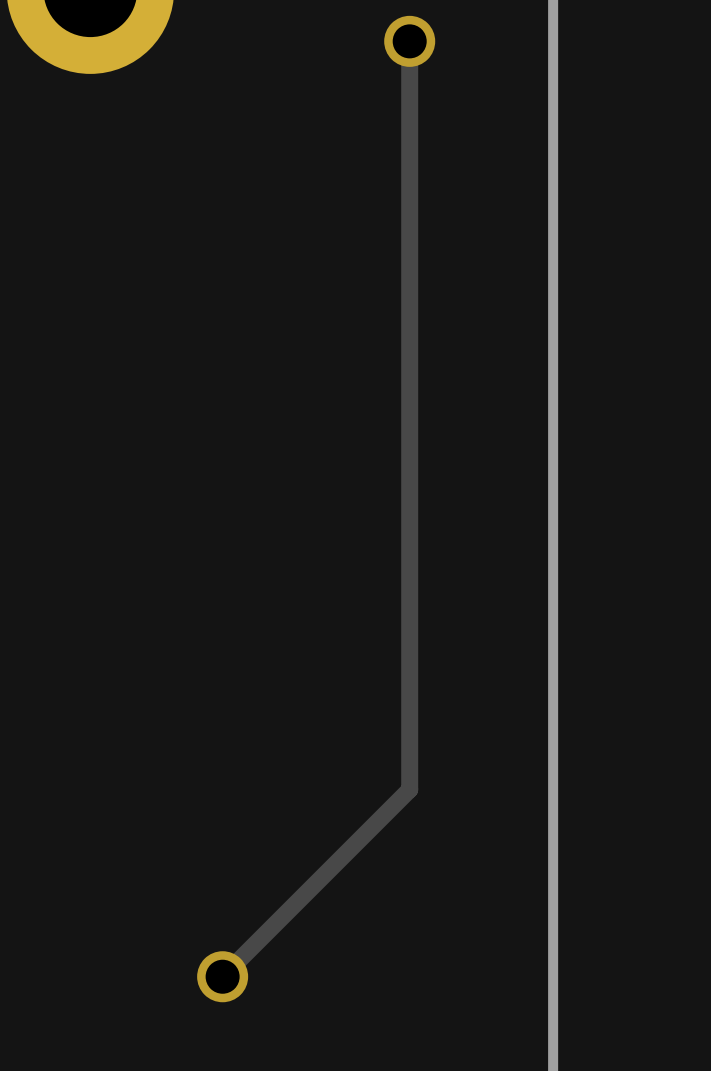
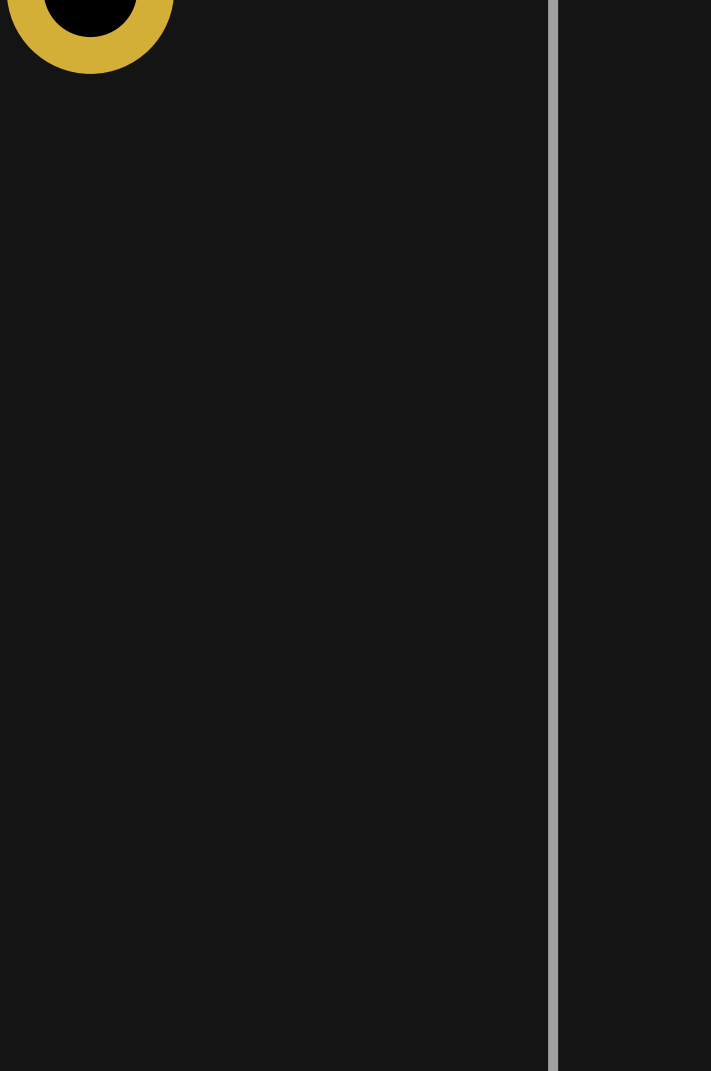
track: (409, 41) (409, 789) (222, 976) -> none
via: (409, 41) -> none
via: (222, 976) -> none

